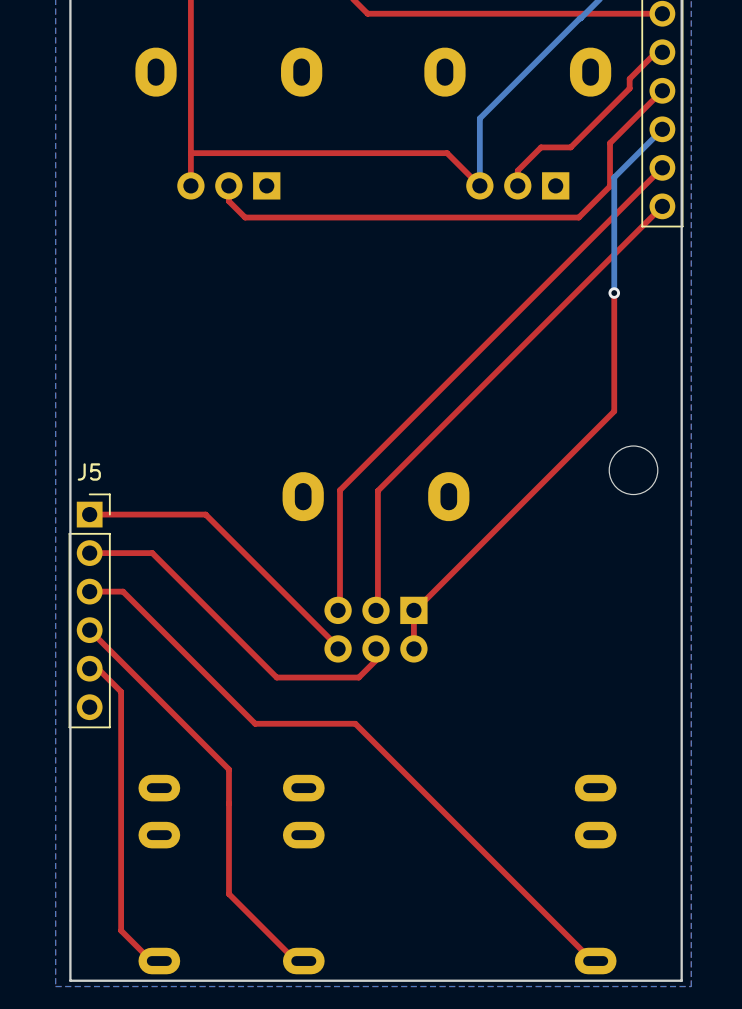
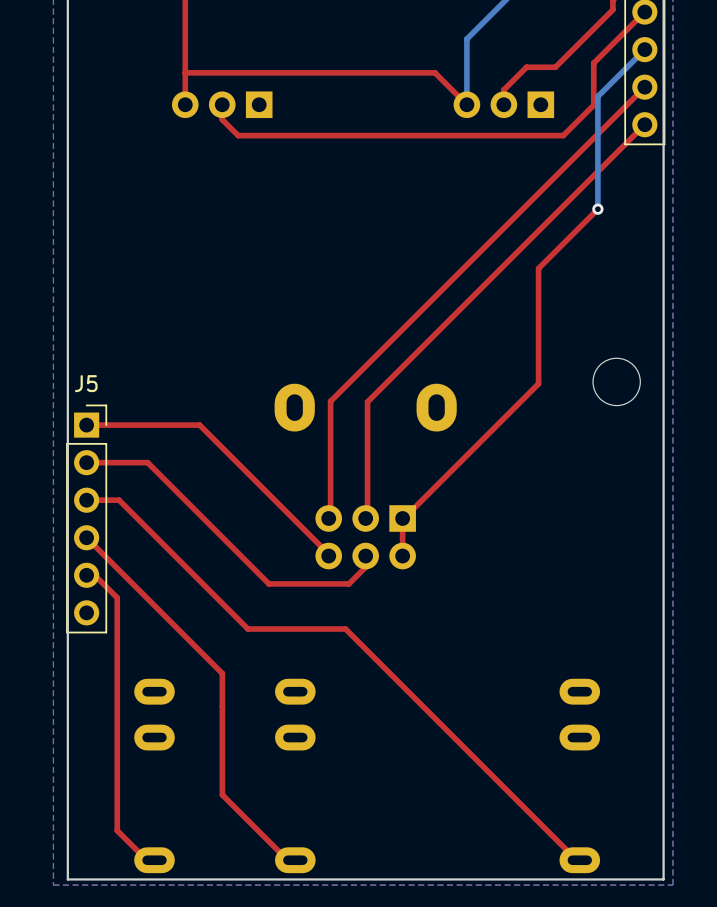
top track: (614, 293) (614, 411) (553, 472) -> (597, 209) (538, 268) (538, 383)

